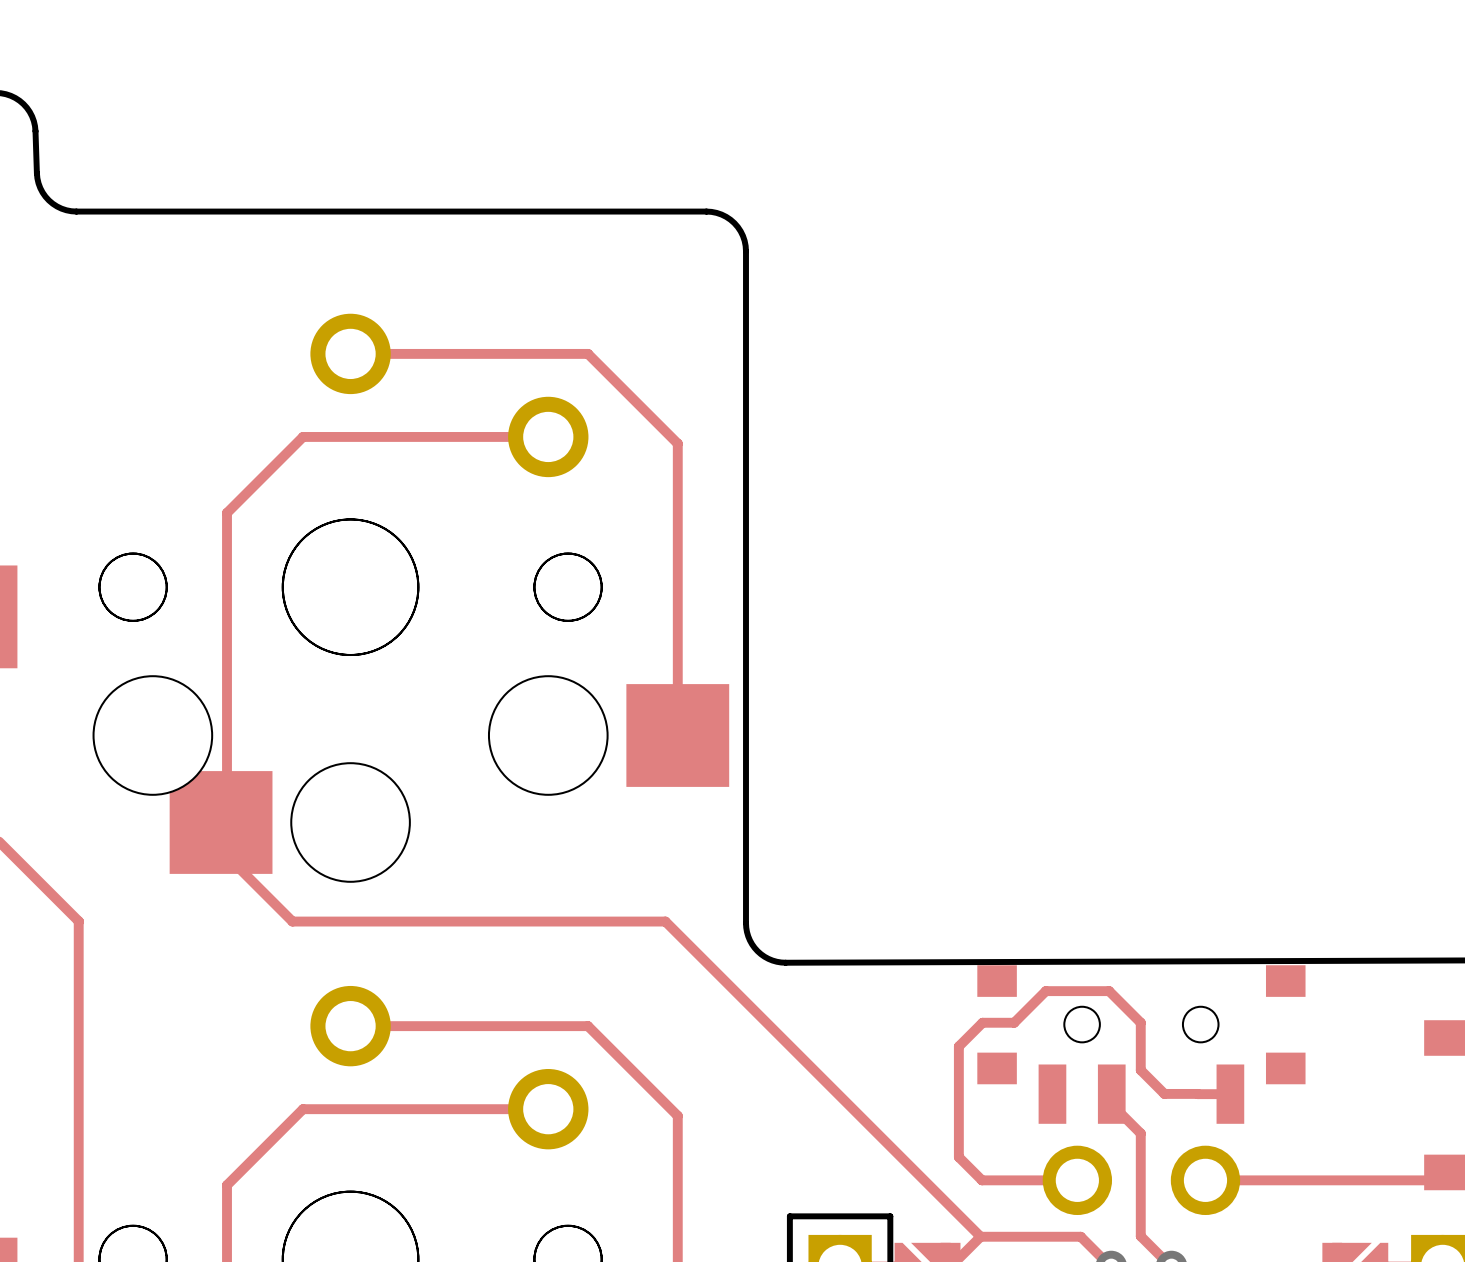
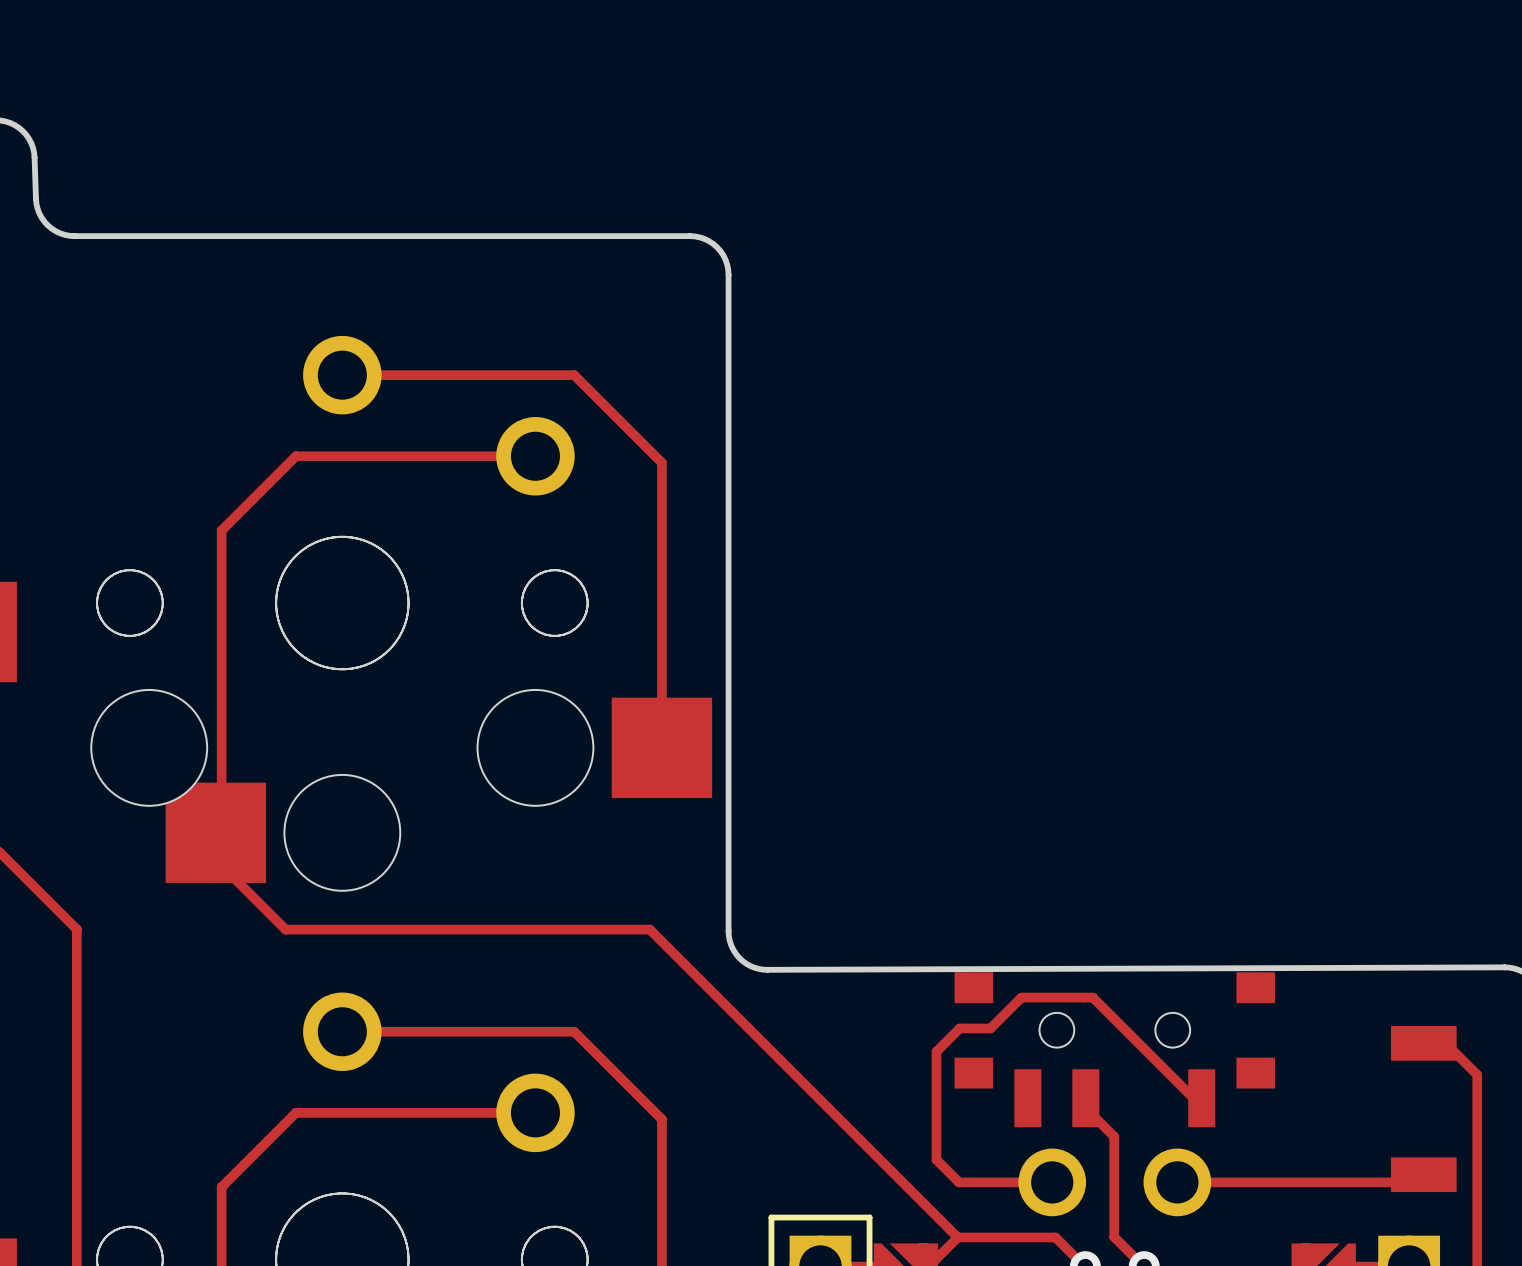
track: (1109, 991) (1140, 1022) (1140, 1070) (1164, 1093) (1221, 1094) -> (1083, 997) (1092, 997) (1193, 1098)

